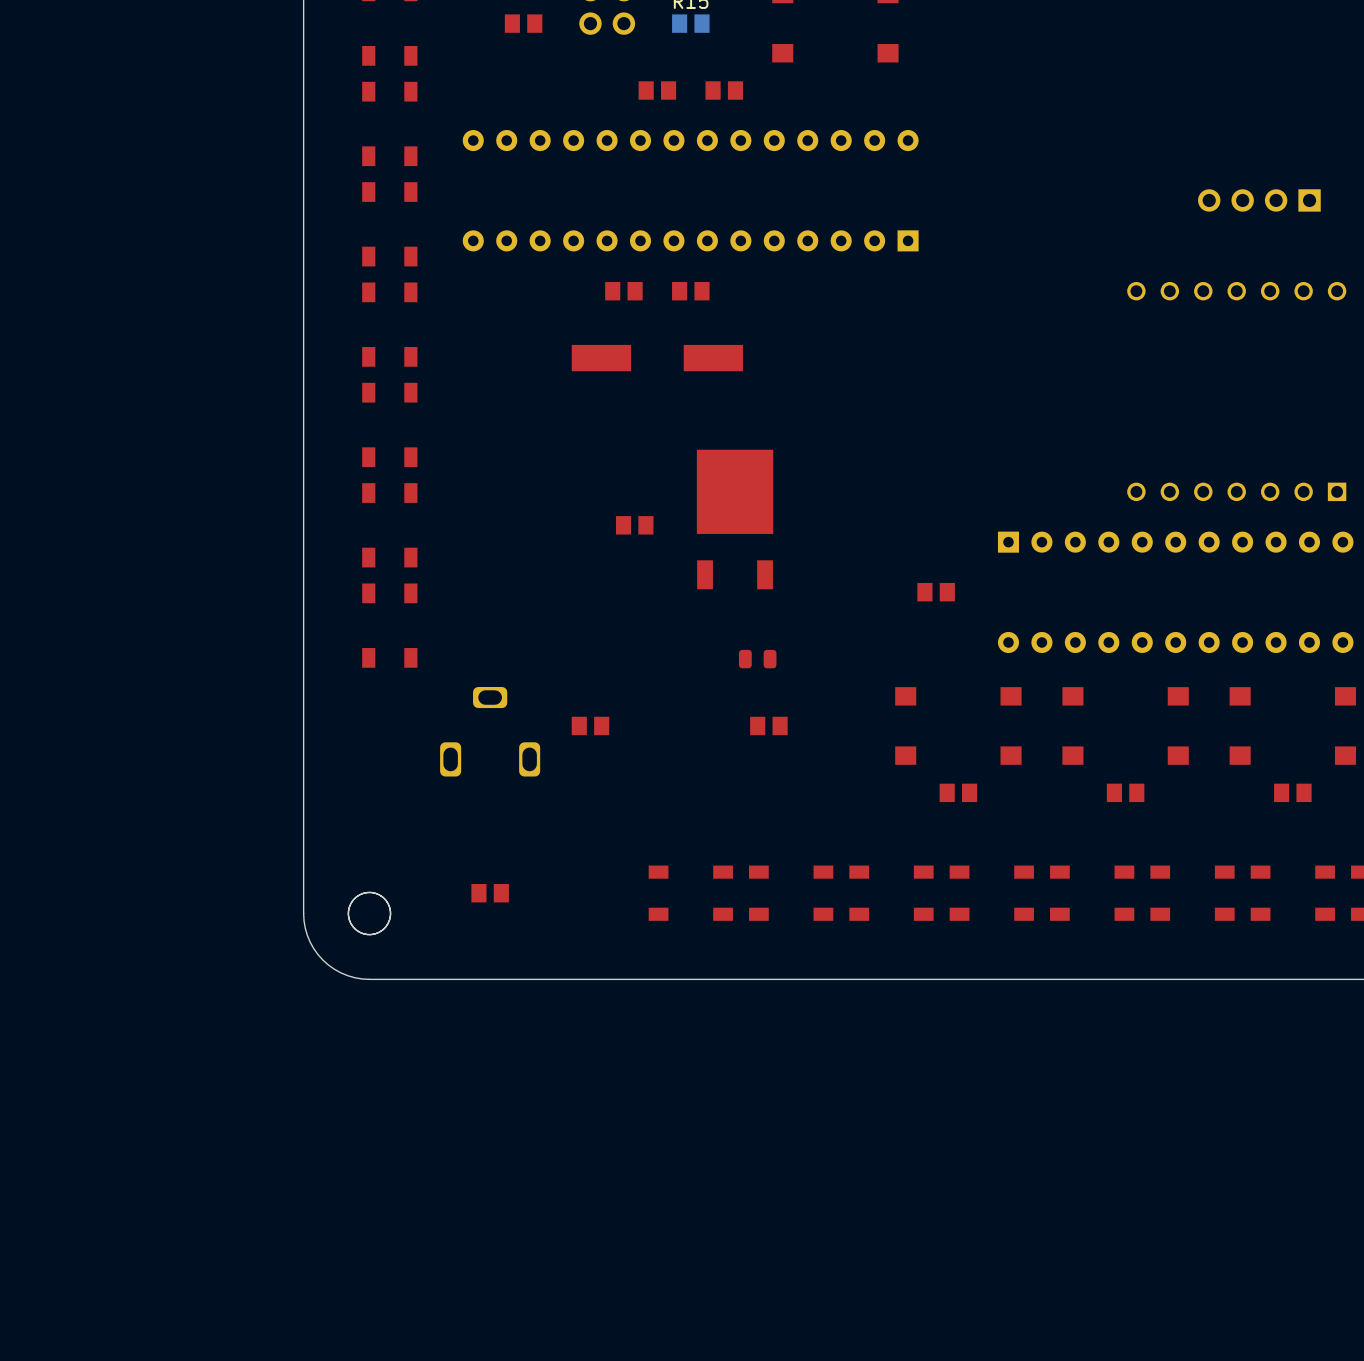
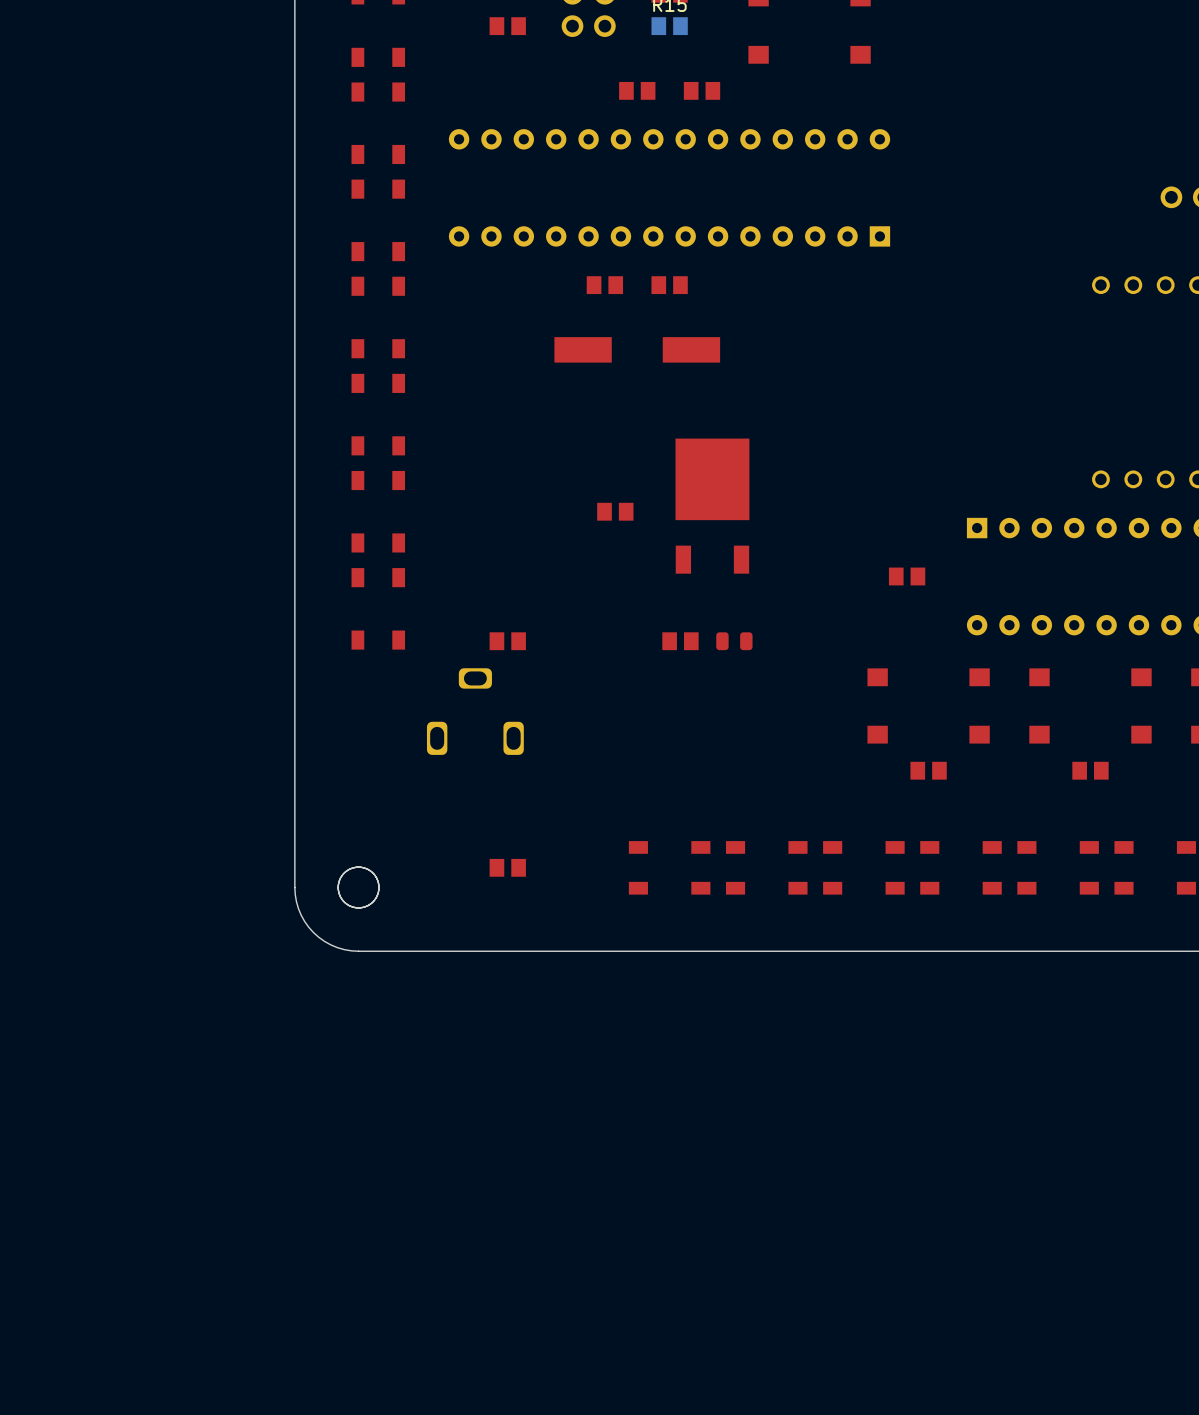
part: none -> (507, 641)
part: none -> (680, 641)
part: (590, 725) -> none
part: (768, 725) -> none
part position: (490, 893) -> (507, 867)

